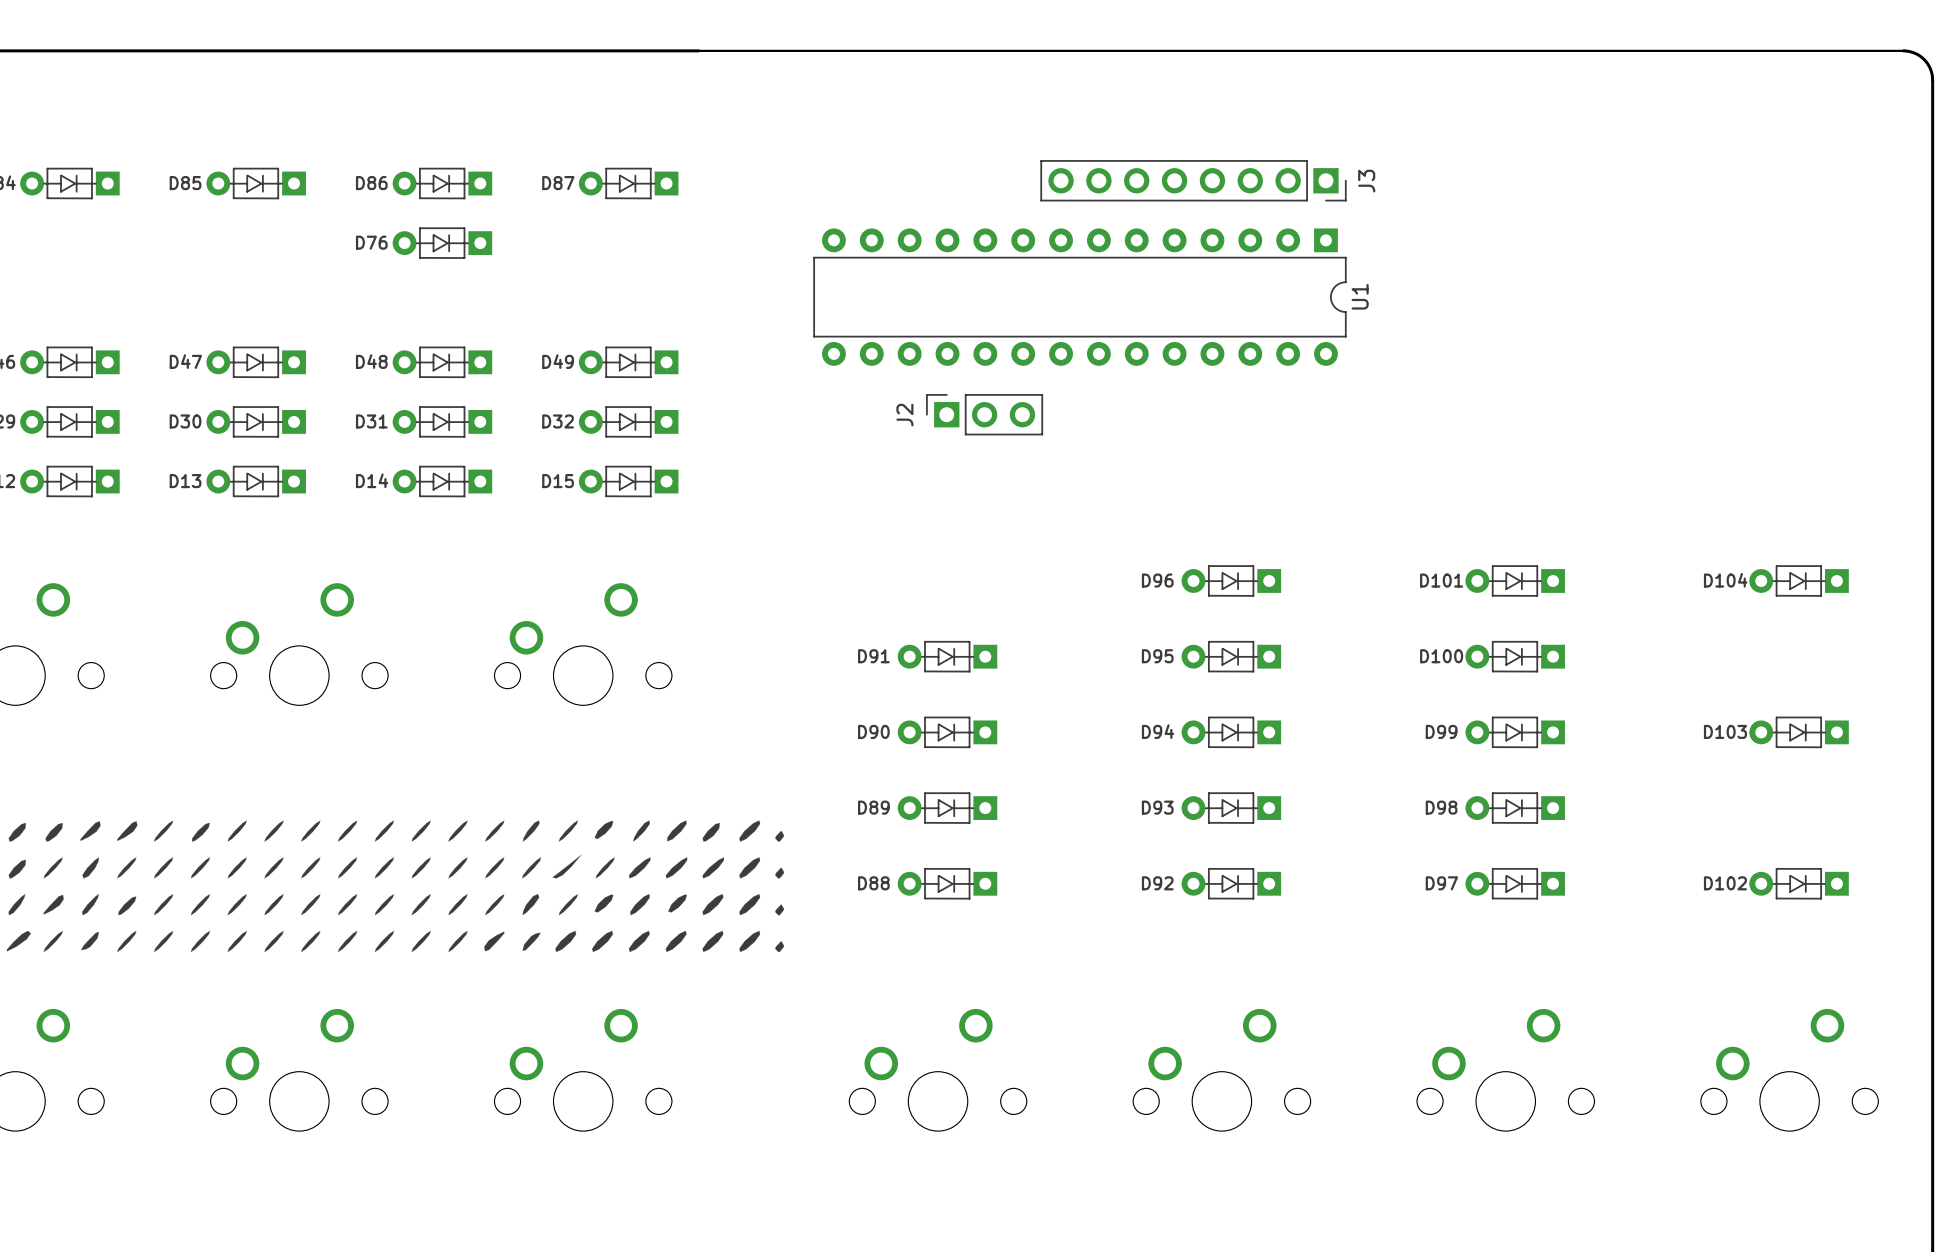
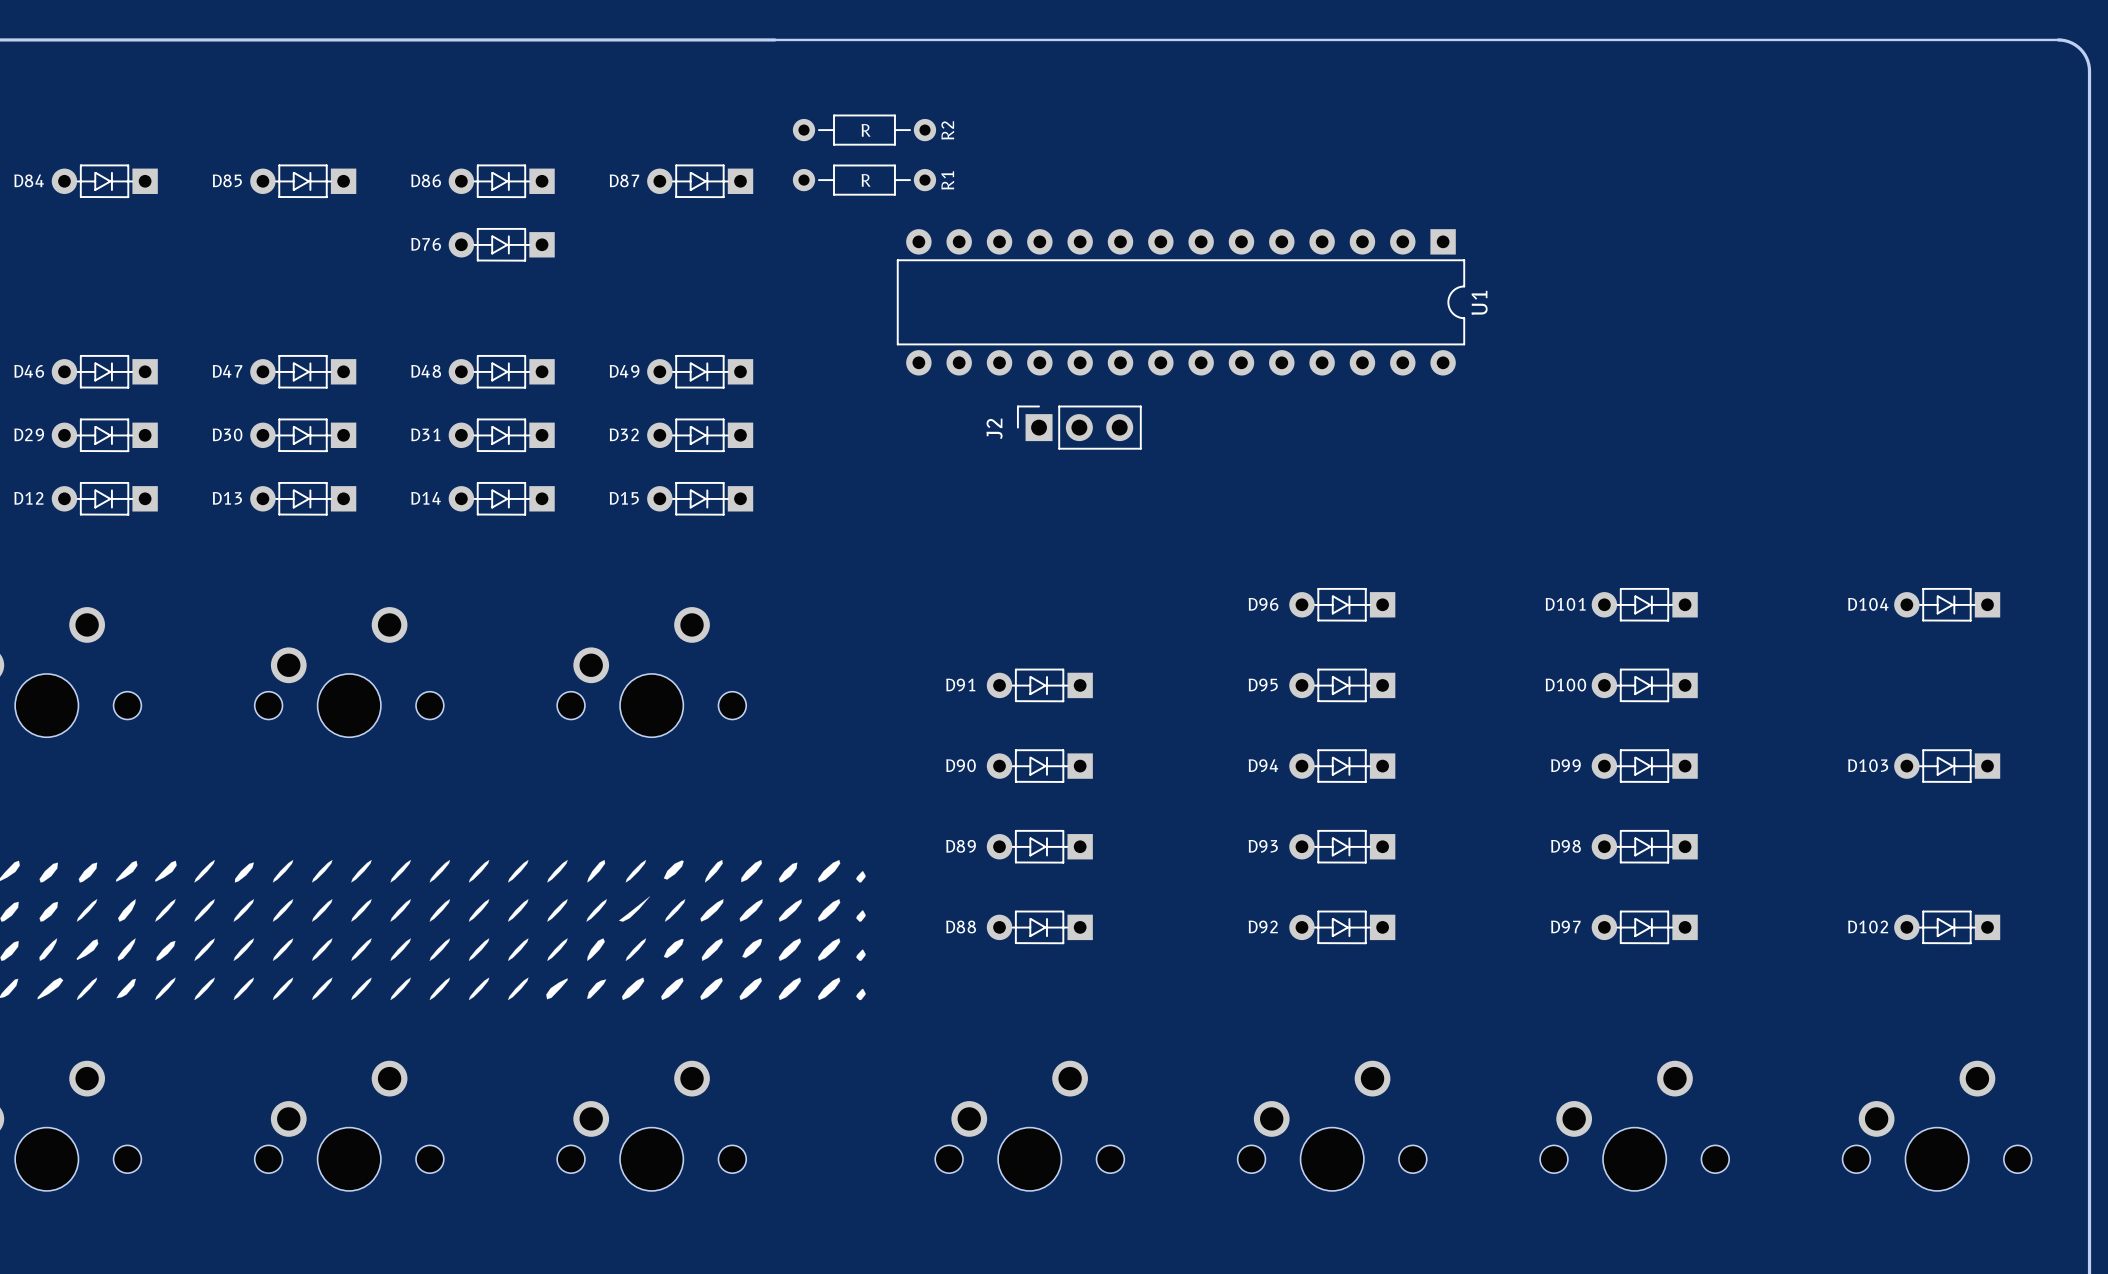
R2: none -> R (864, 130)
J3: (1193, 180) -> none
R1: none -> R (864, 180)

